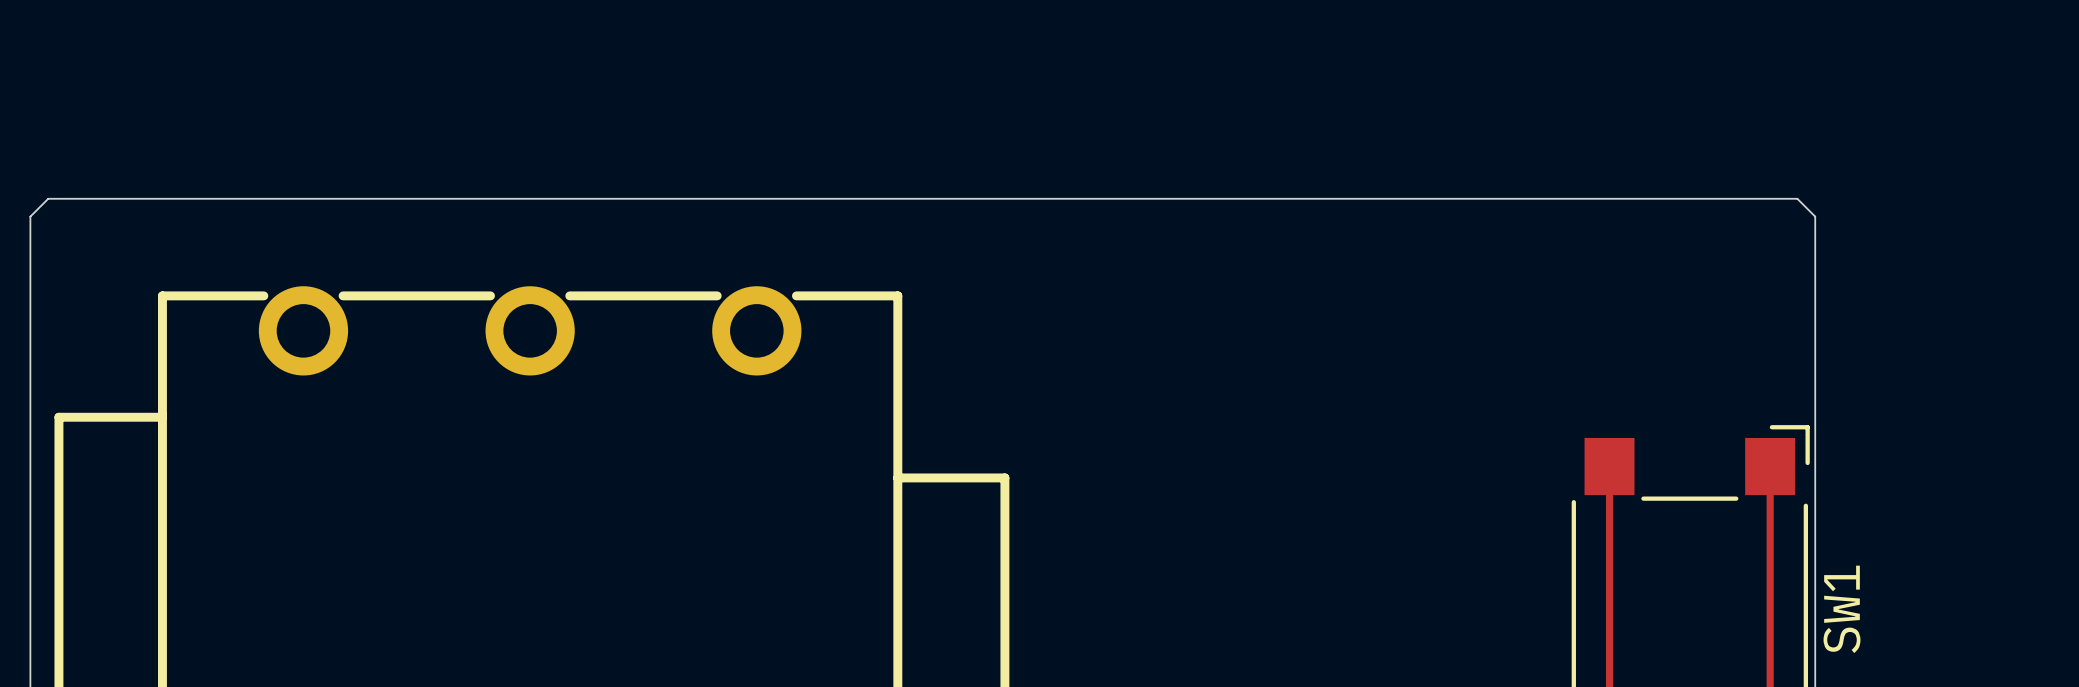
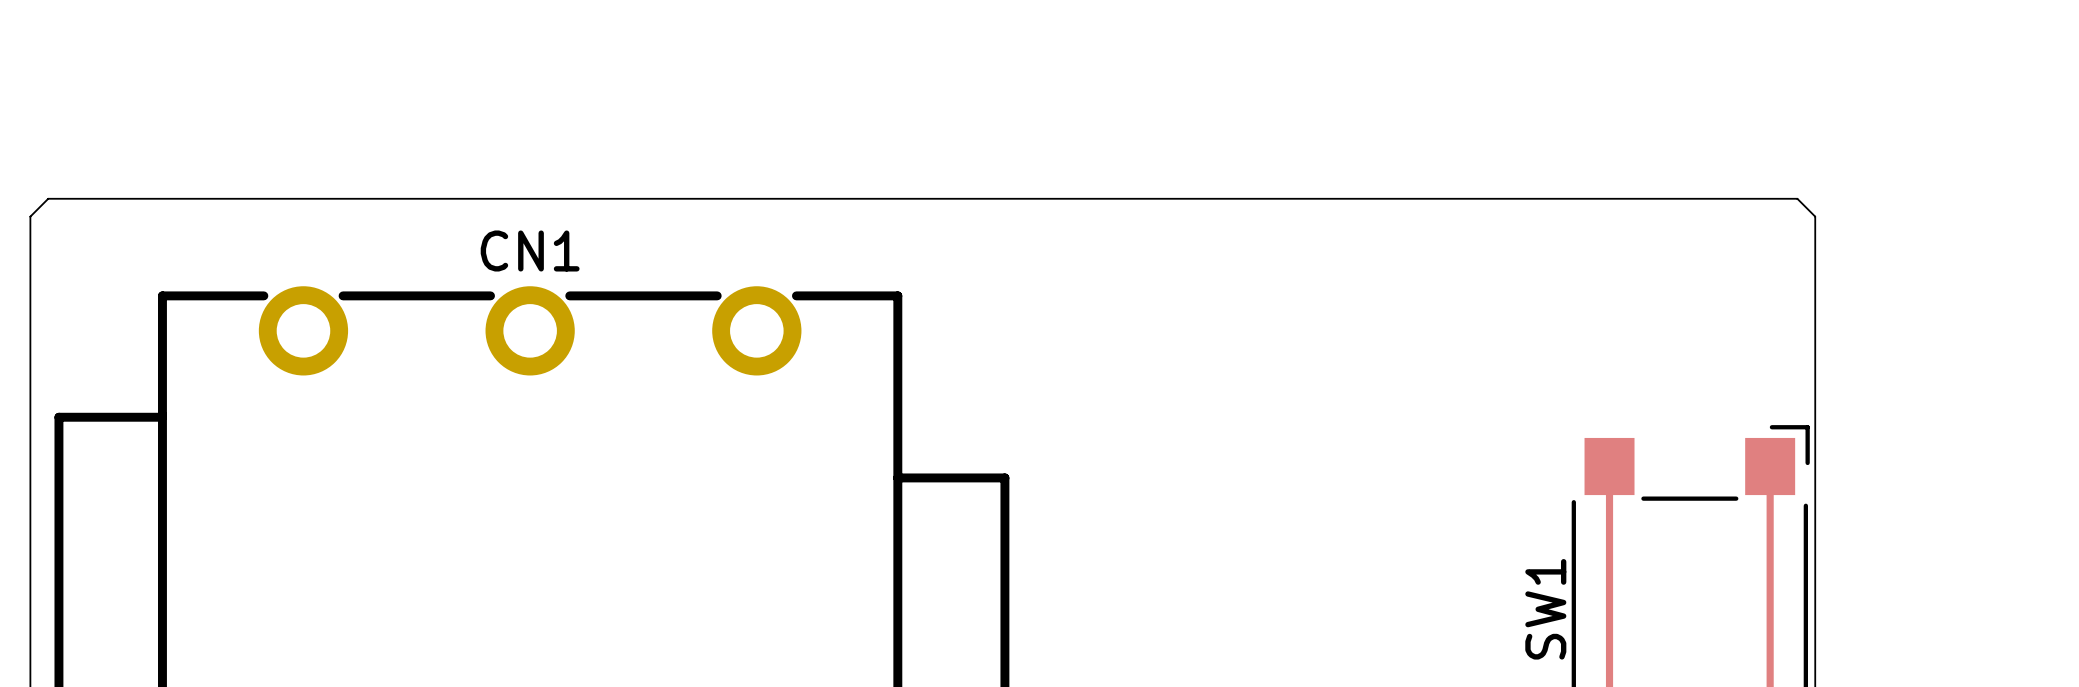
CN1 name: none -> CN1 (530, 250)
SW1 name position: SW1 (1842, 609) -> SW1 (1545, 609)

